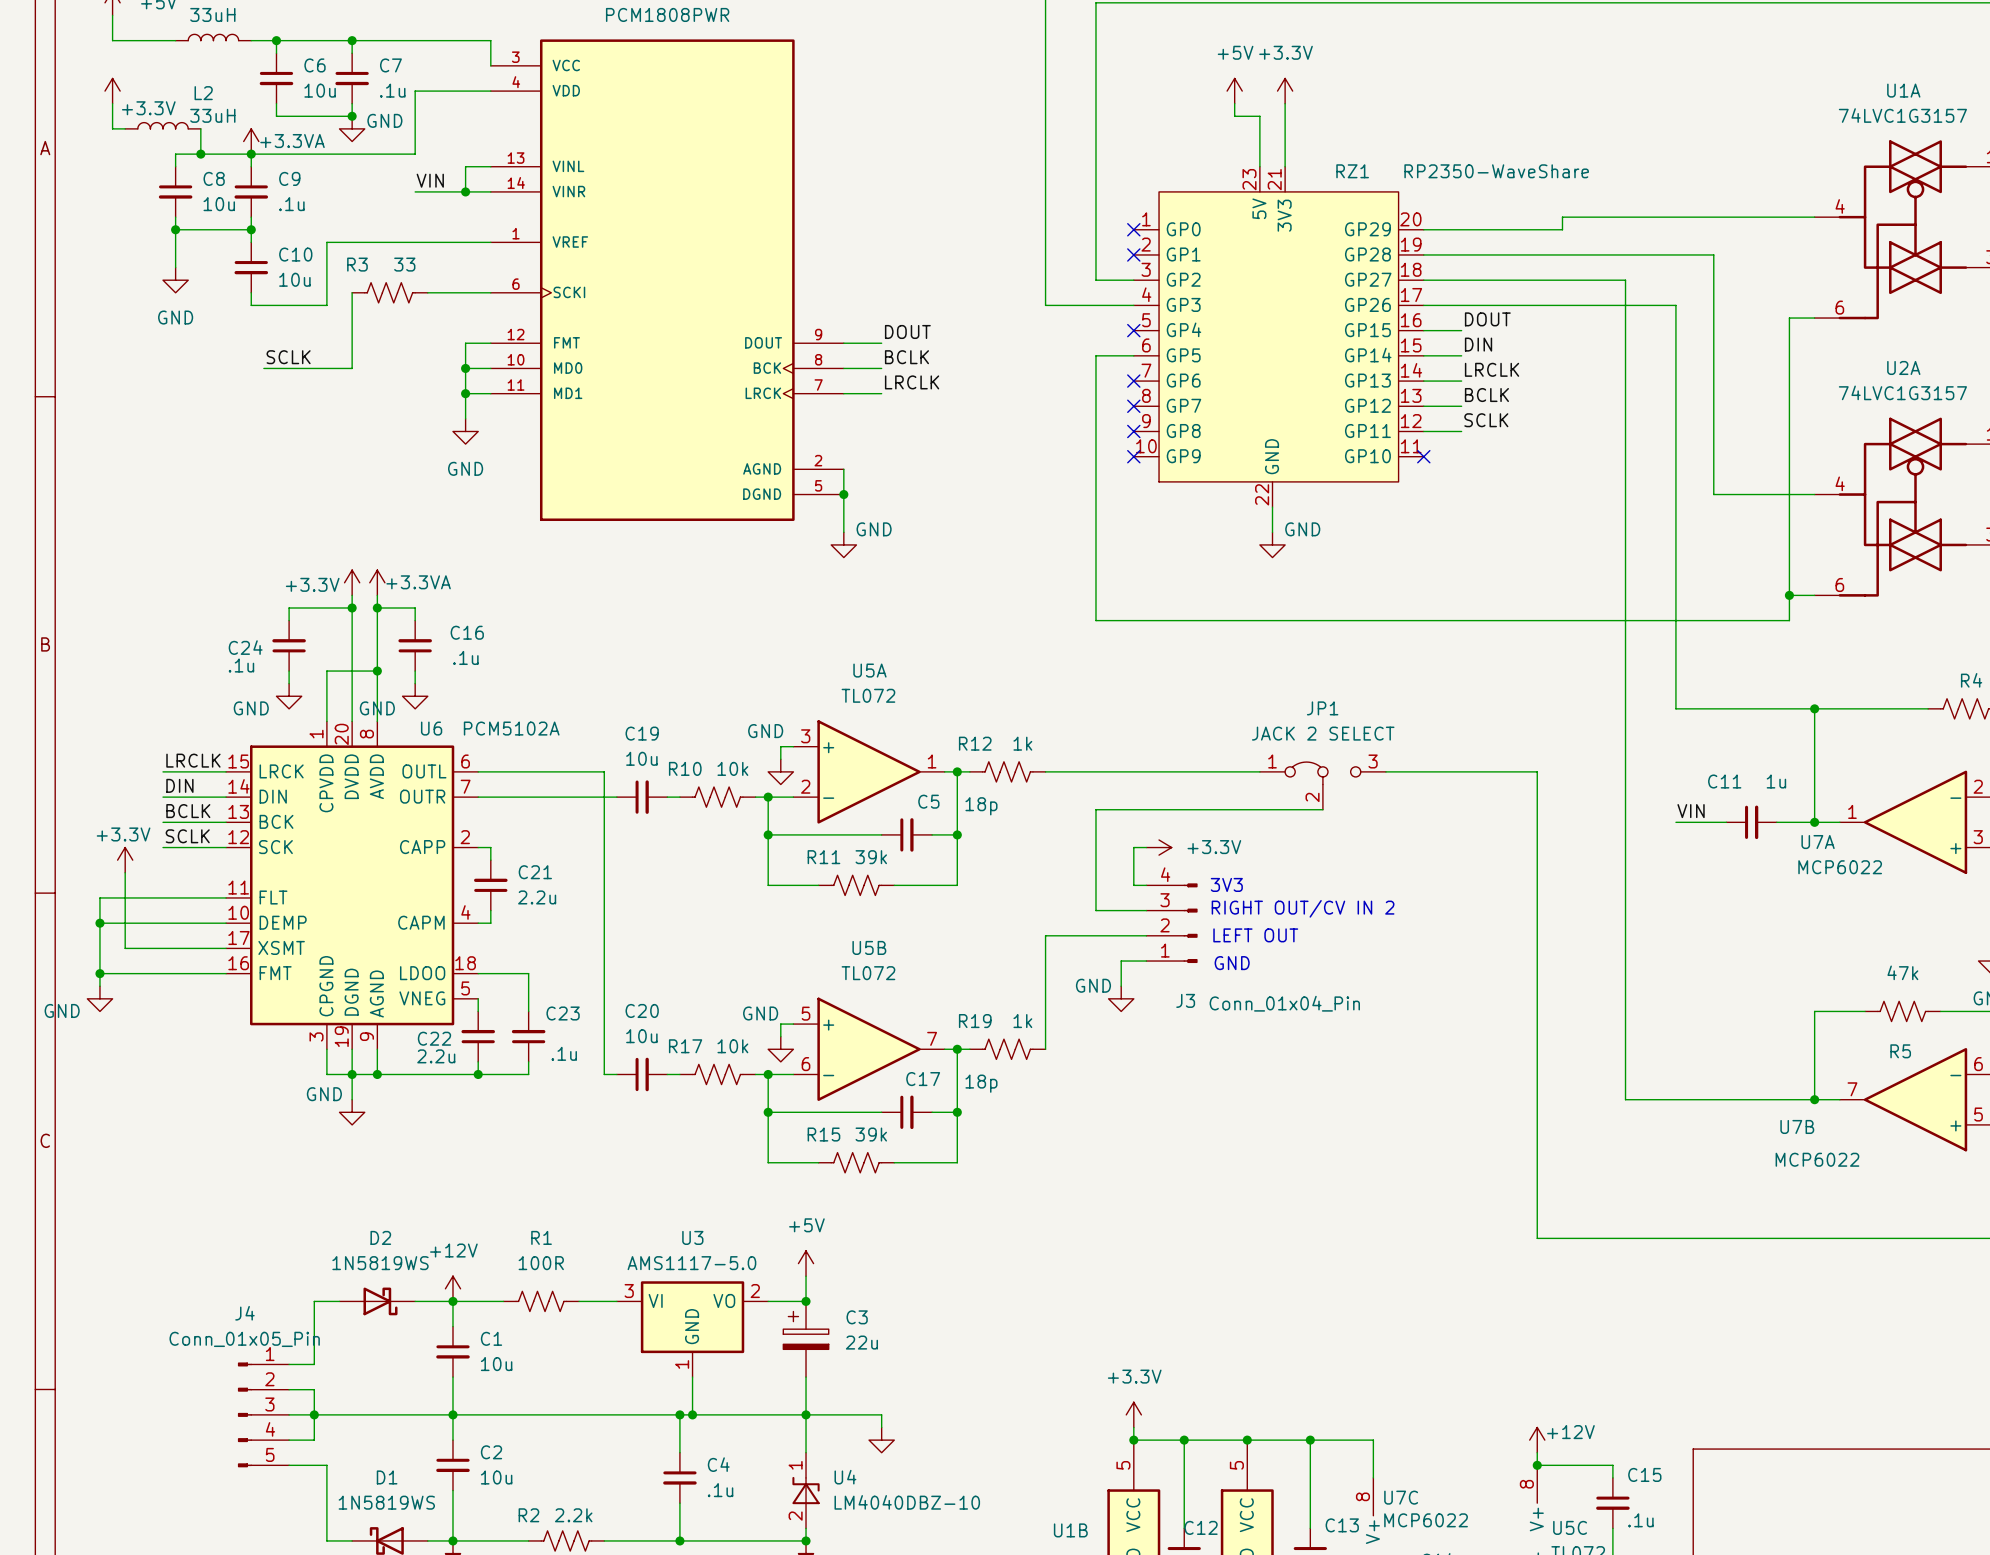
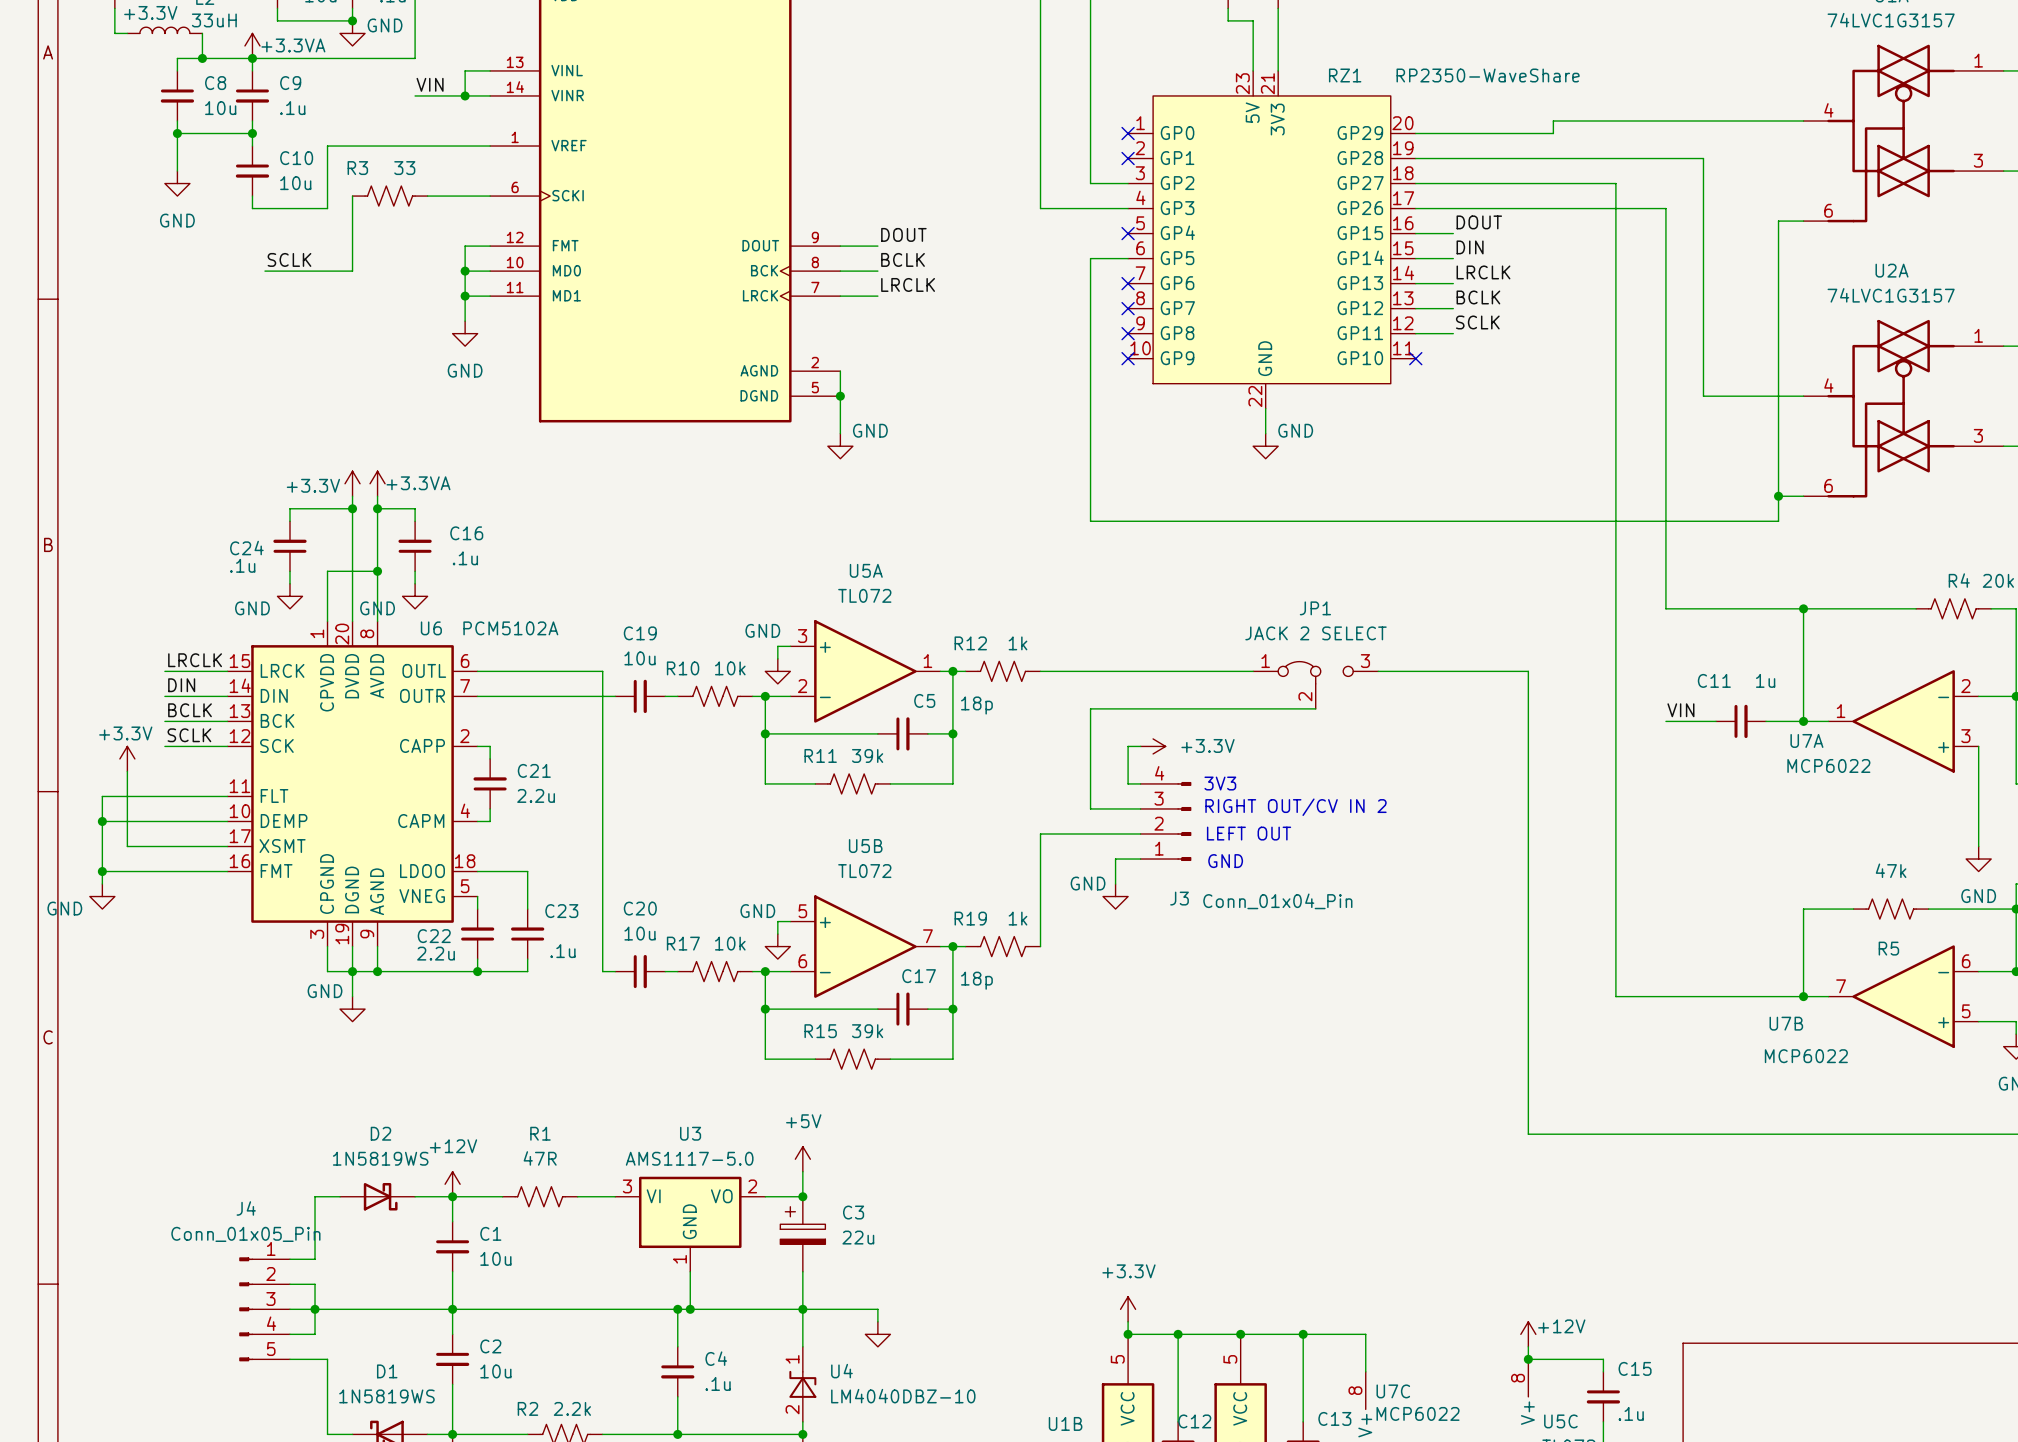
R1 value: 100R (541, 1263) -> 47R (540, 1158)

